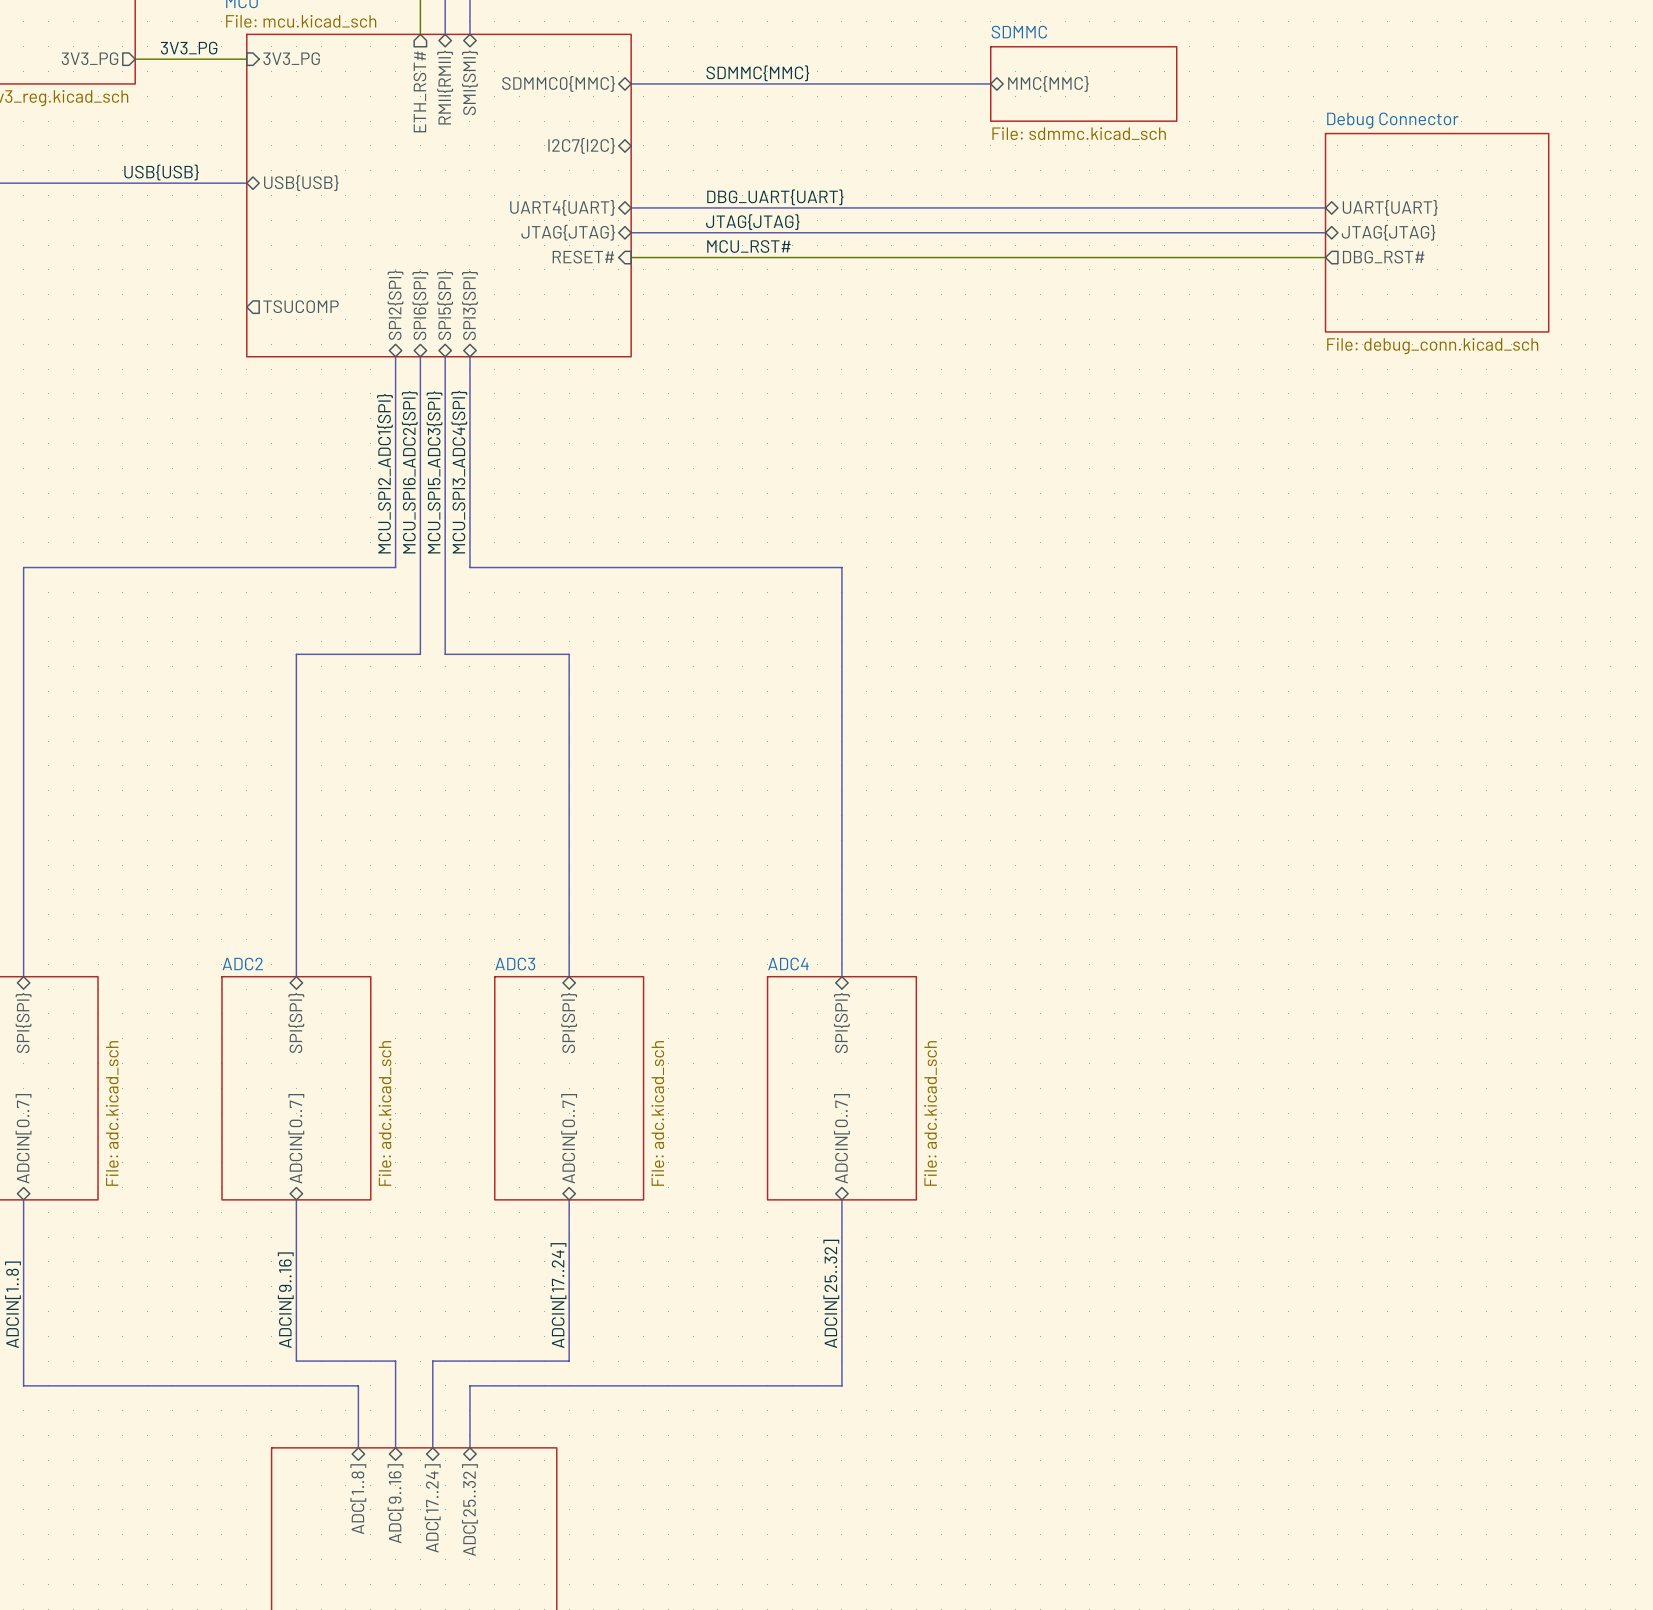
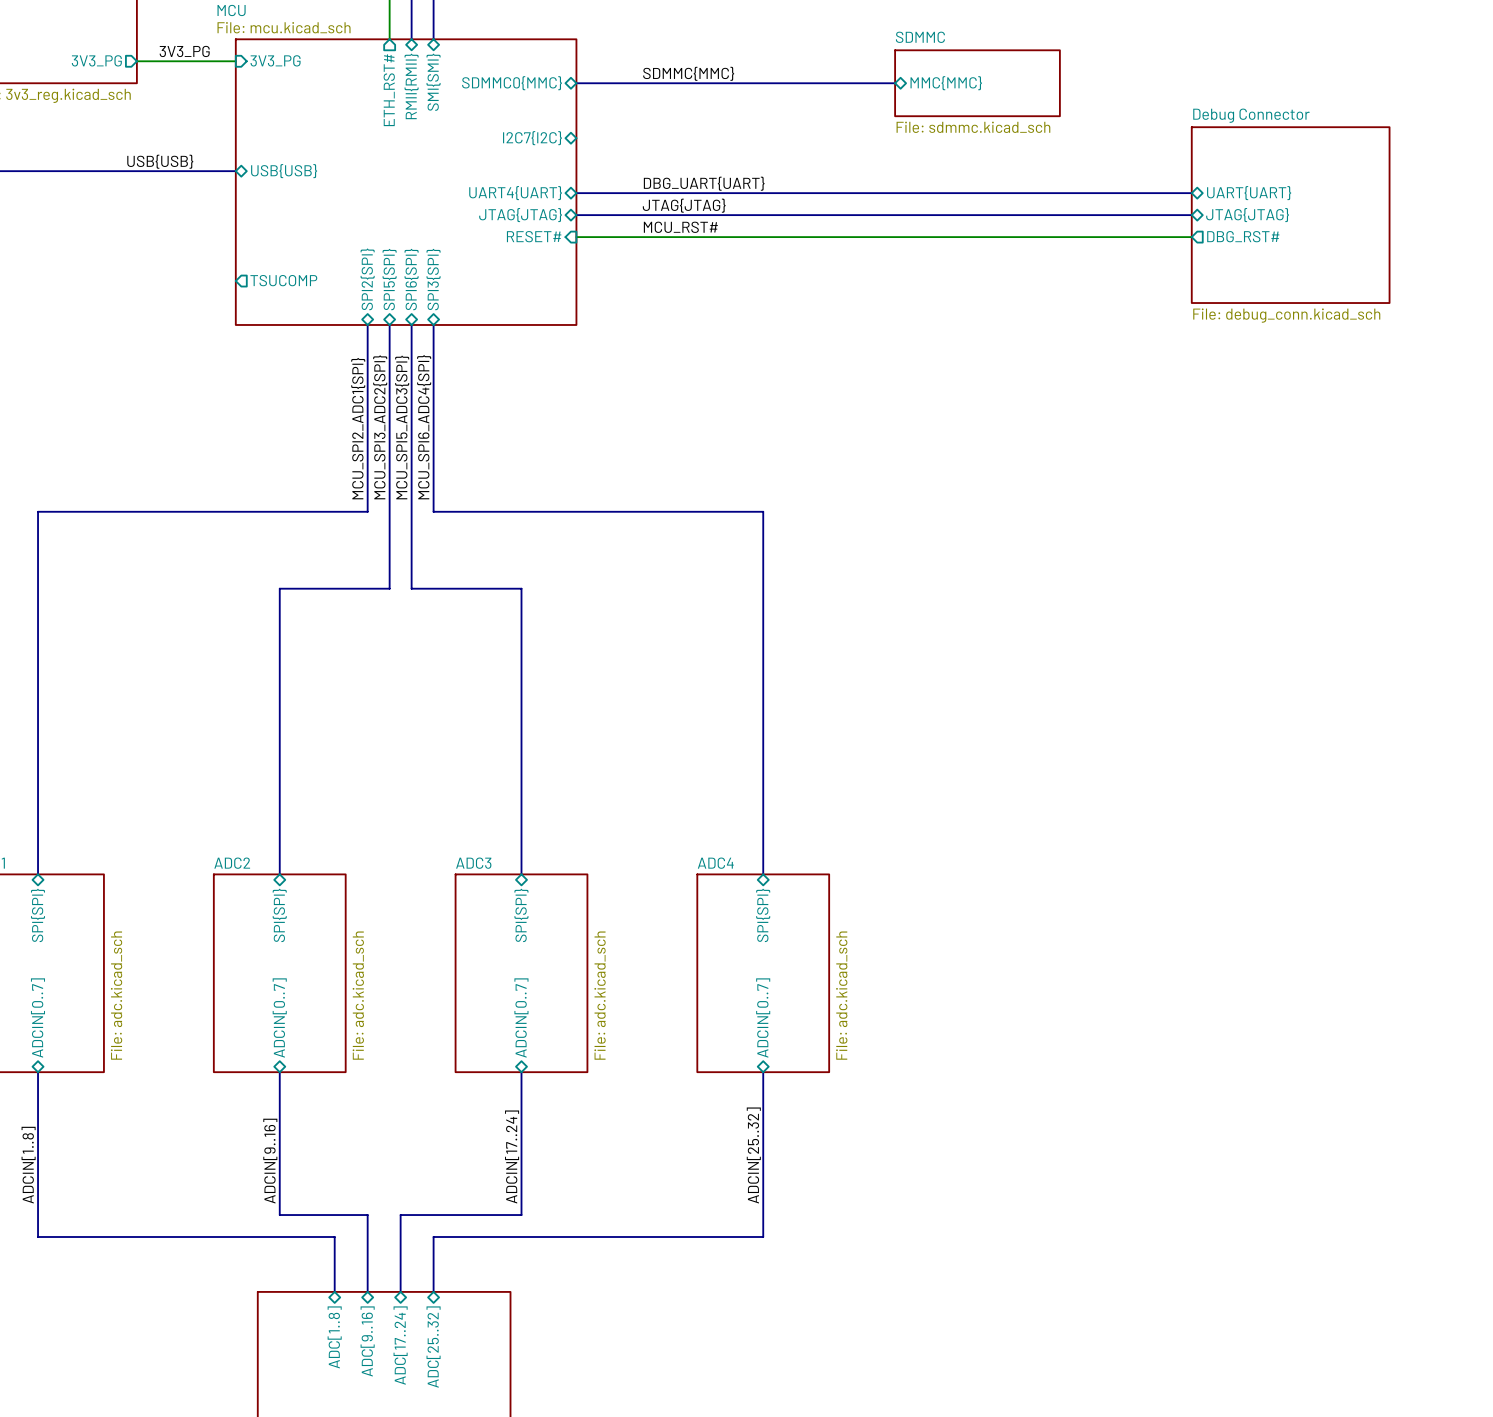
sheet pin: SPI6{SPI} (420, 305) -> SPI5{SPI} (389, 279)
sheet pin: SPI5{SPI} (445, 305) -> SPI6{SPI} (411, 279)
label: MCU_SPI6_ADC2{SPI} (409, 472) -> MCU_SPI3_ADC2{SPI} (380, 427)
label: MCU_SPI3_ADC4{SPI} (459, 472) -> MCU_SPI6_ADC4{SPI} (424, 427)

